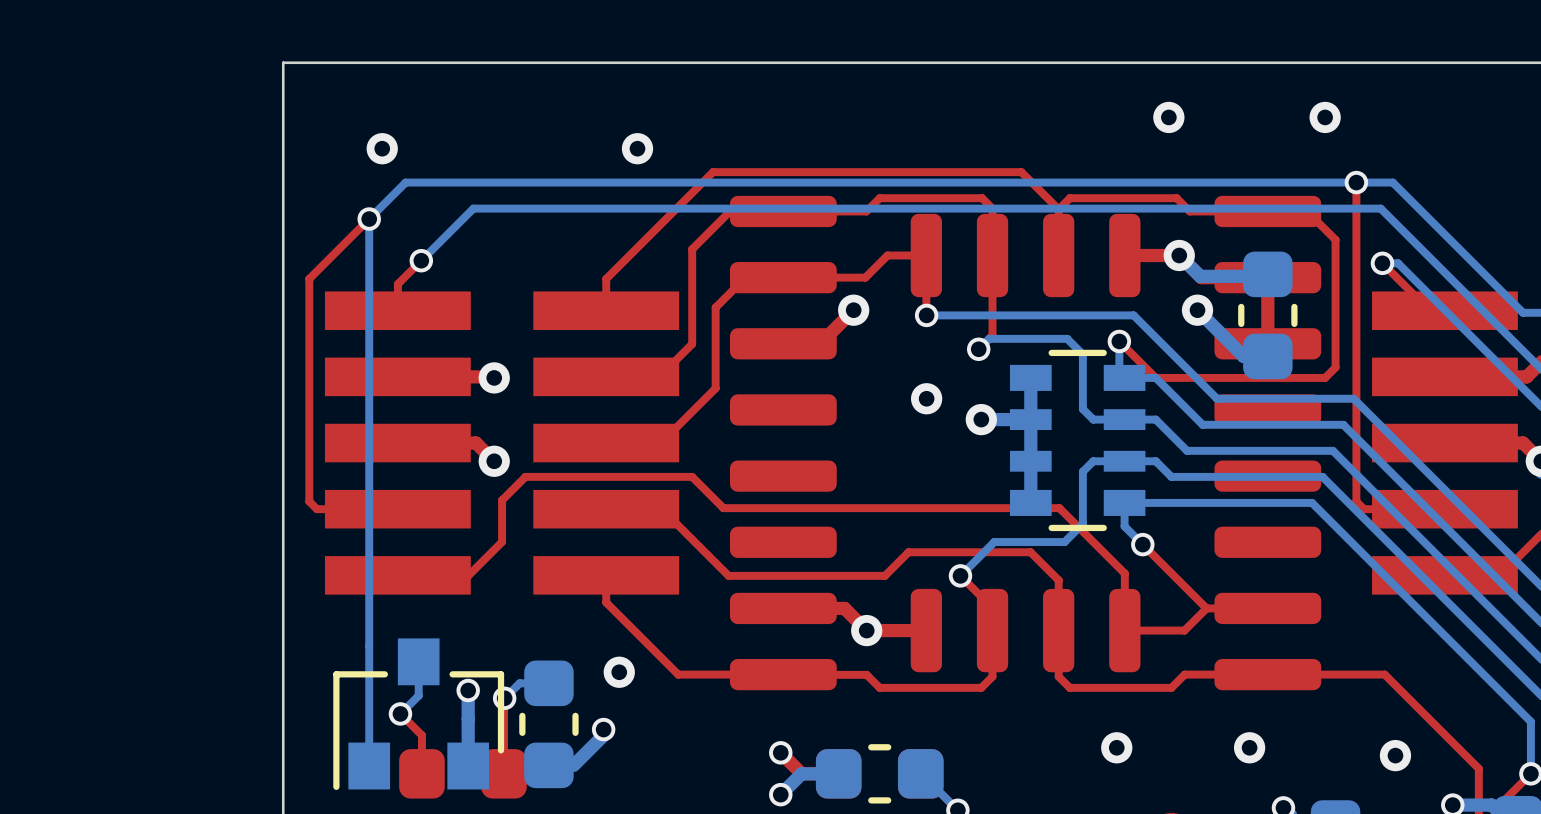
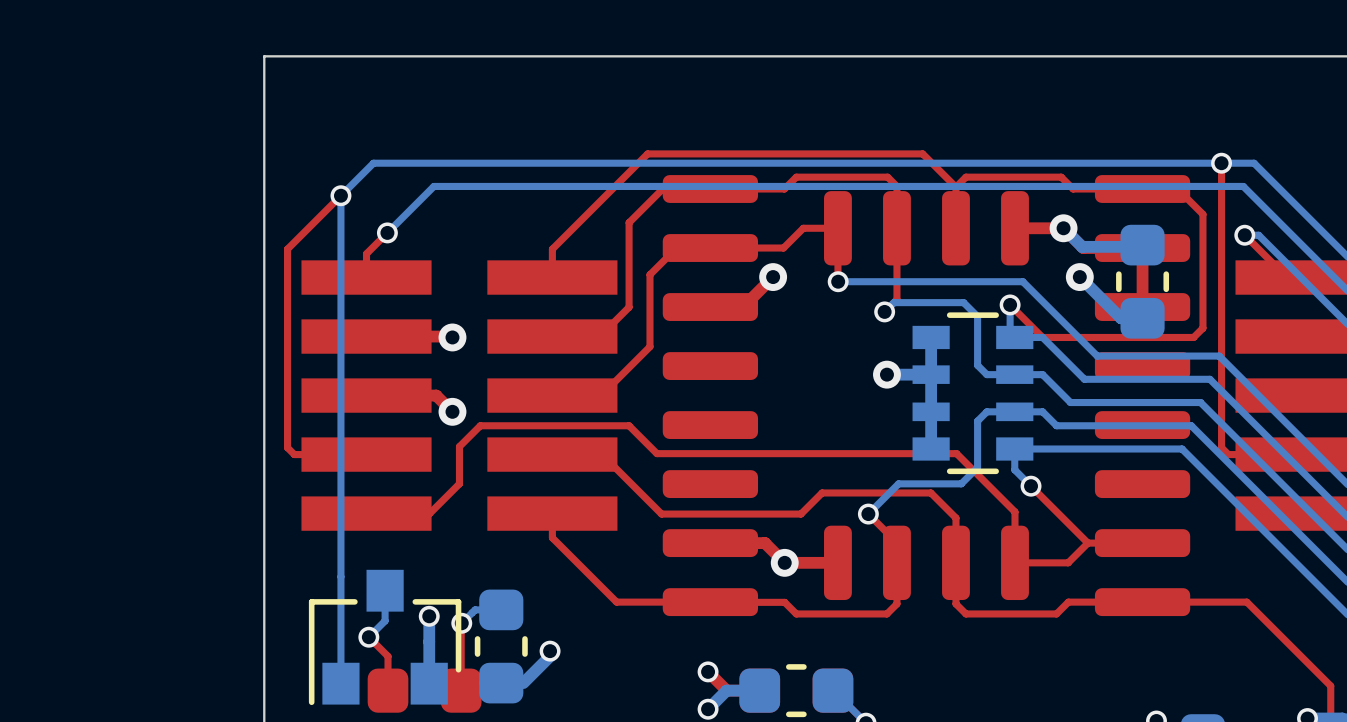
via: (1168, 117) -> none
via: (1325, 117) -> none
via: (382, 148) -> none
via: (637, 148) -> none
via: (926, 398) -> none
via: (619, 672) -> none
via: (1116, 747) -> none
via: (1249, 747) -> none
via: (1395, 755) -> none

